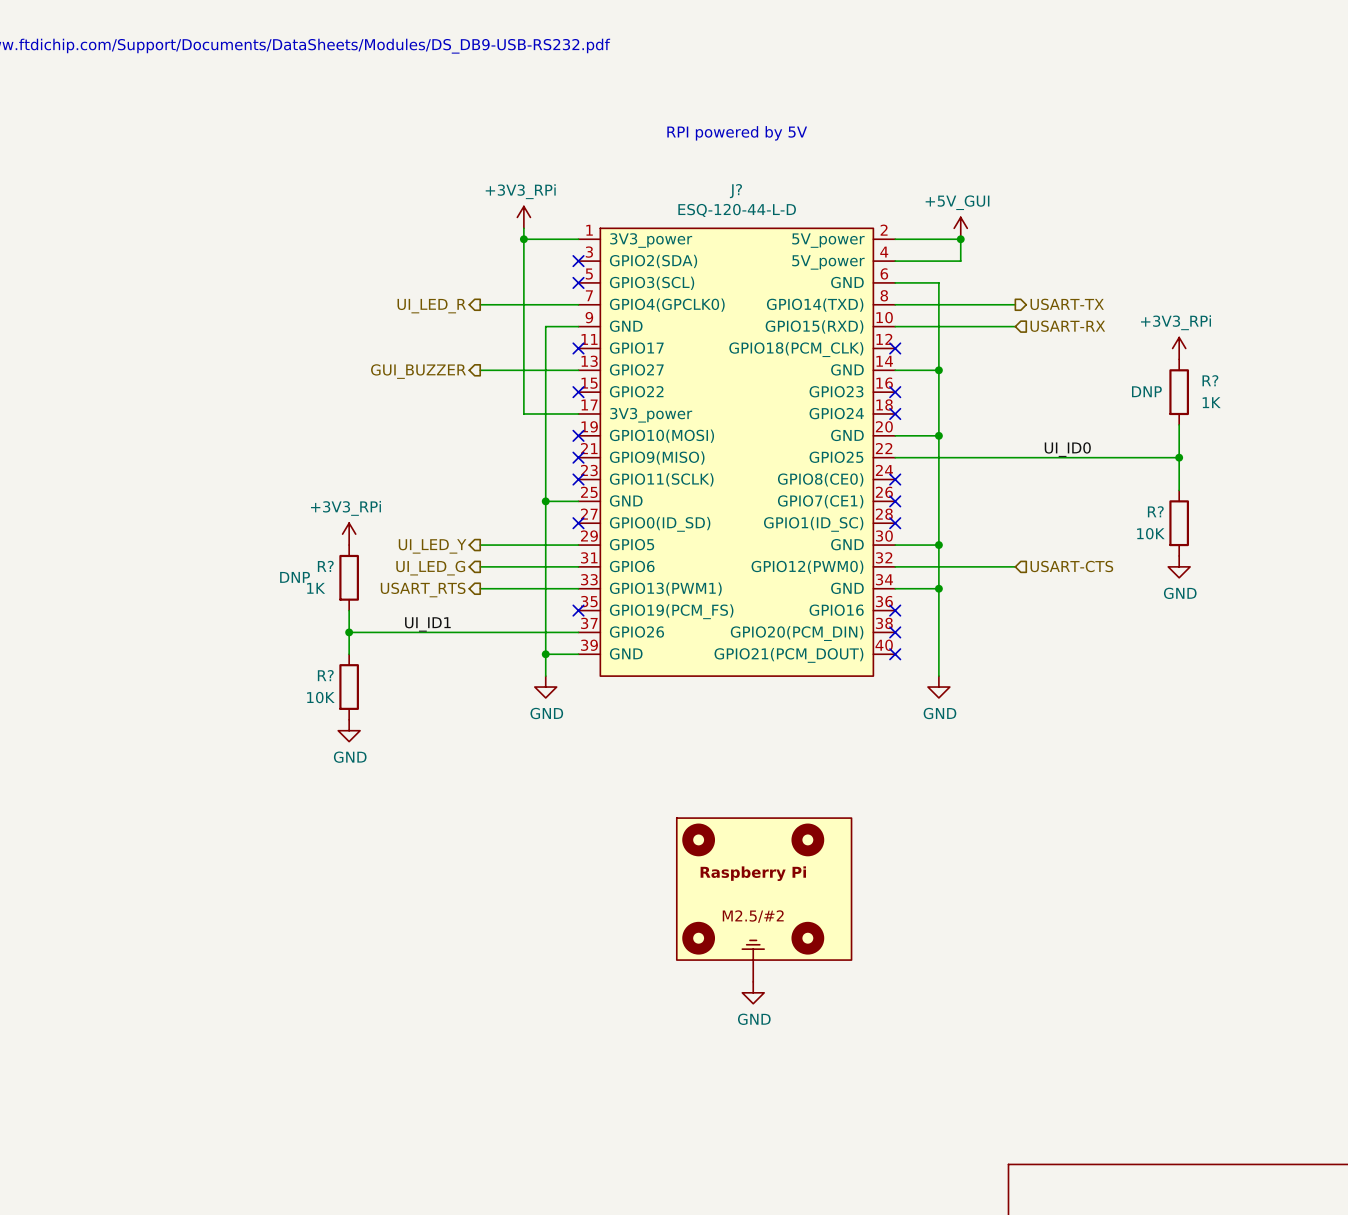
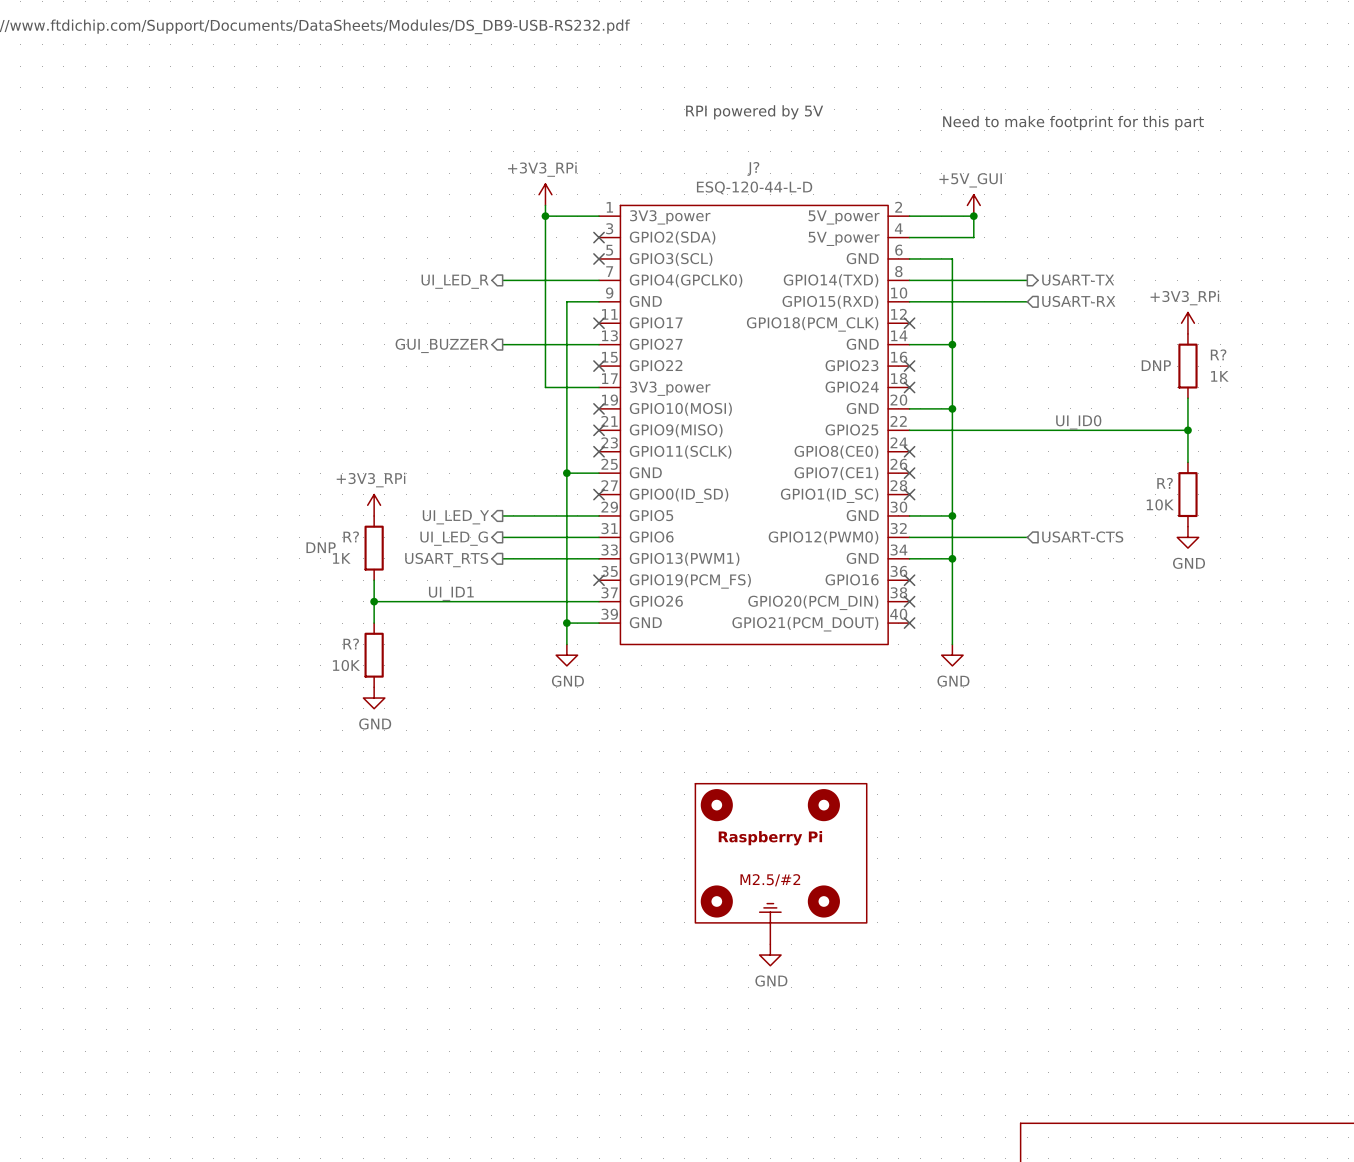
text: none -> Need to make footprint for this part (1073, 123)

